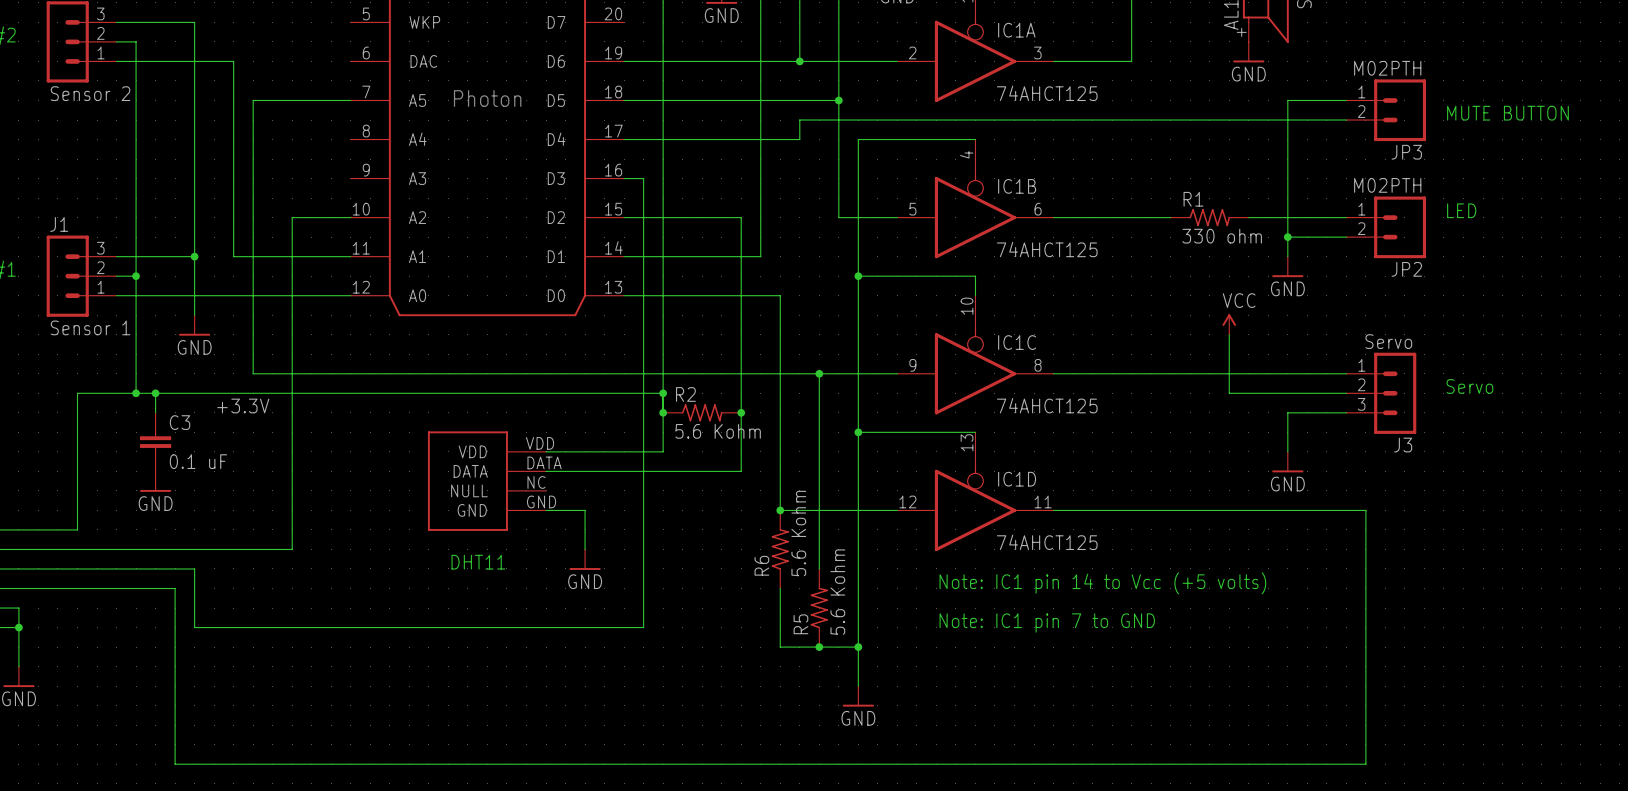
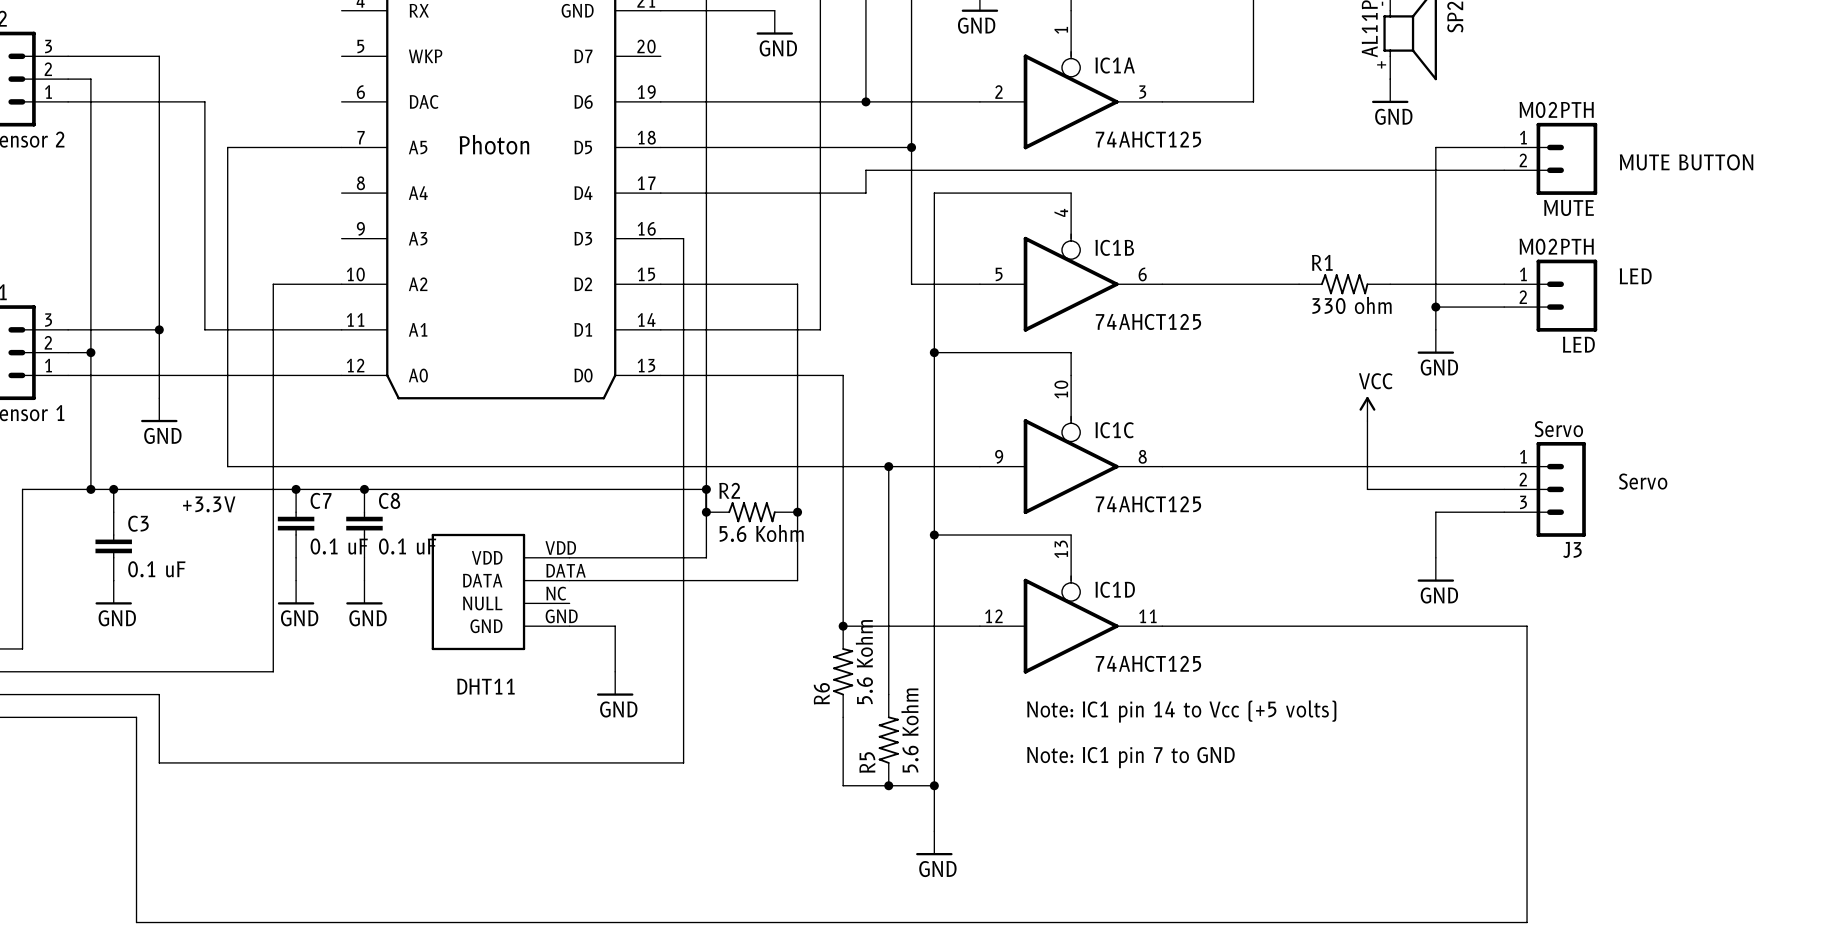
JP3 name: JP3 (1406, 152) -> MUTE (1569, 207)
JP2 name: JP2 (1406, 269) -> LED (1578, 344)
junction: none -> (296, 489)
junction: none -> (364, 489)
C7: none -> 0.1 uF (296, 523)
C8: none -> 0.1 uF (364, 523)
wire: none -> (296, 557) (296, 580)
wire: none -> (364, 557) (364, 580)
power symbol: none -> GND (296, 592)
power symbol: none -> GND (364, 592)

